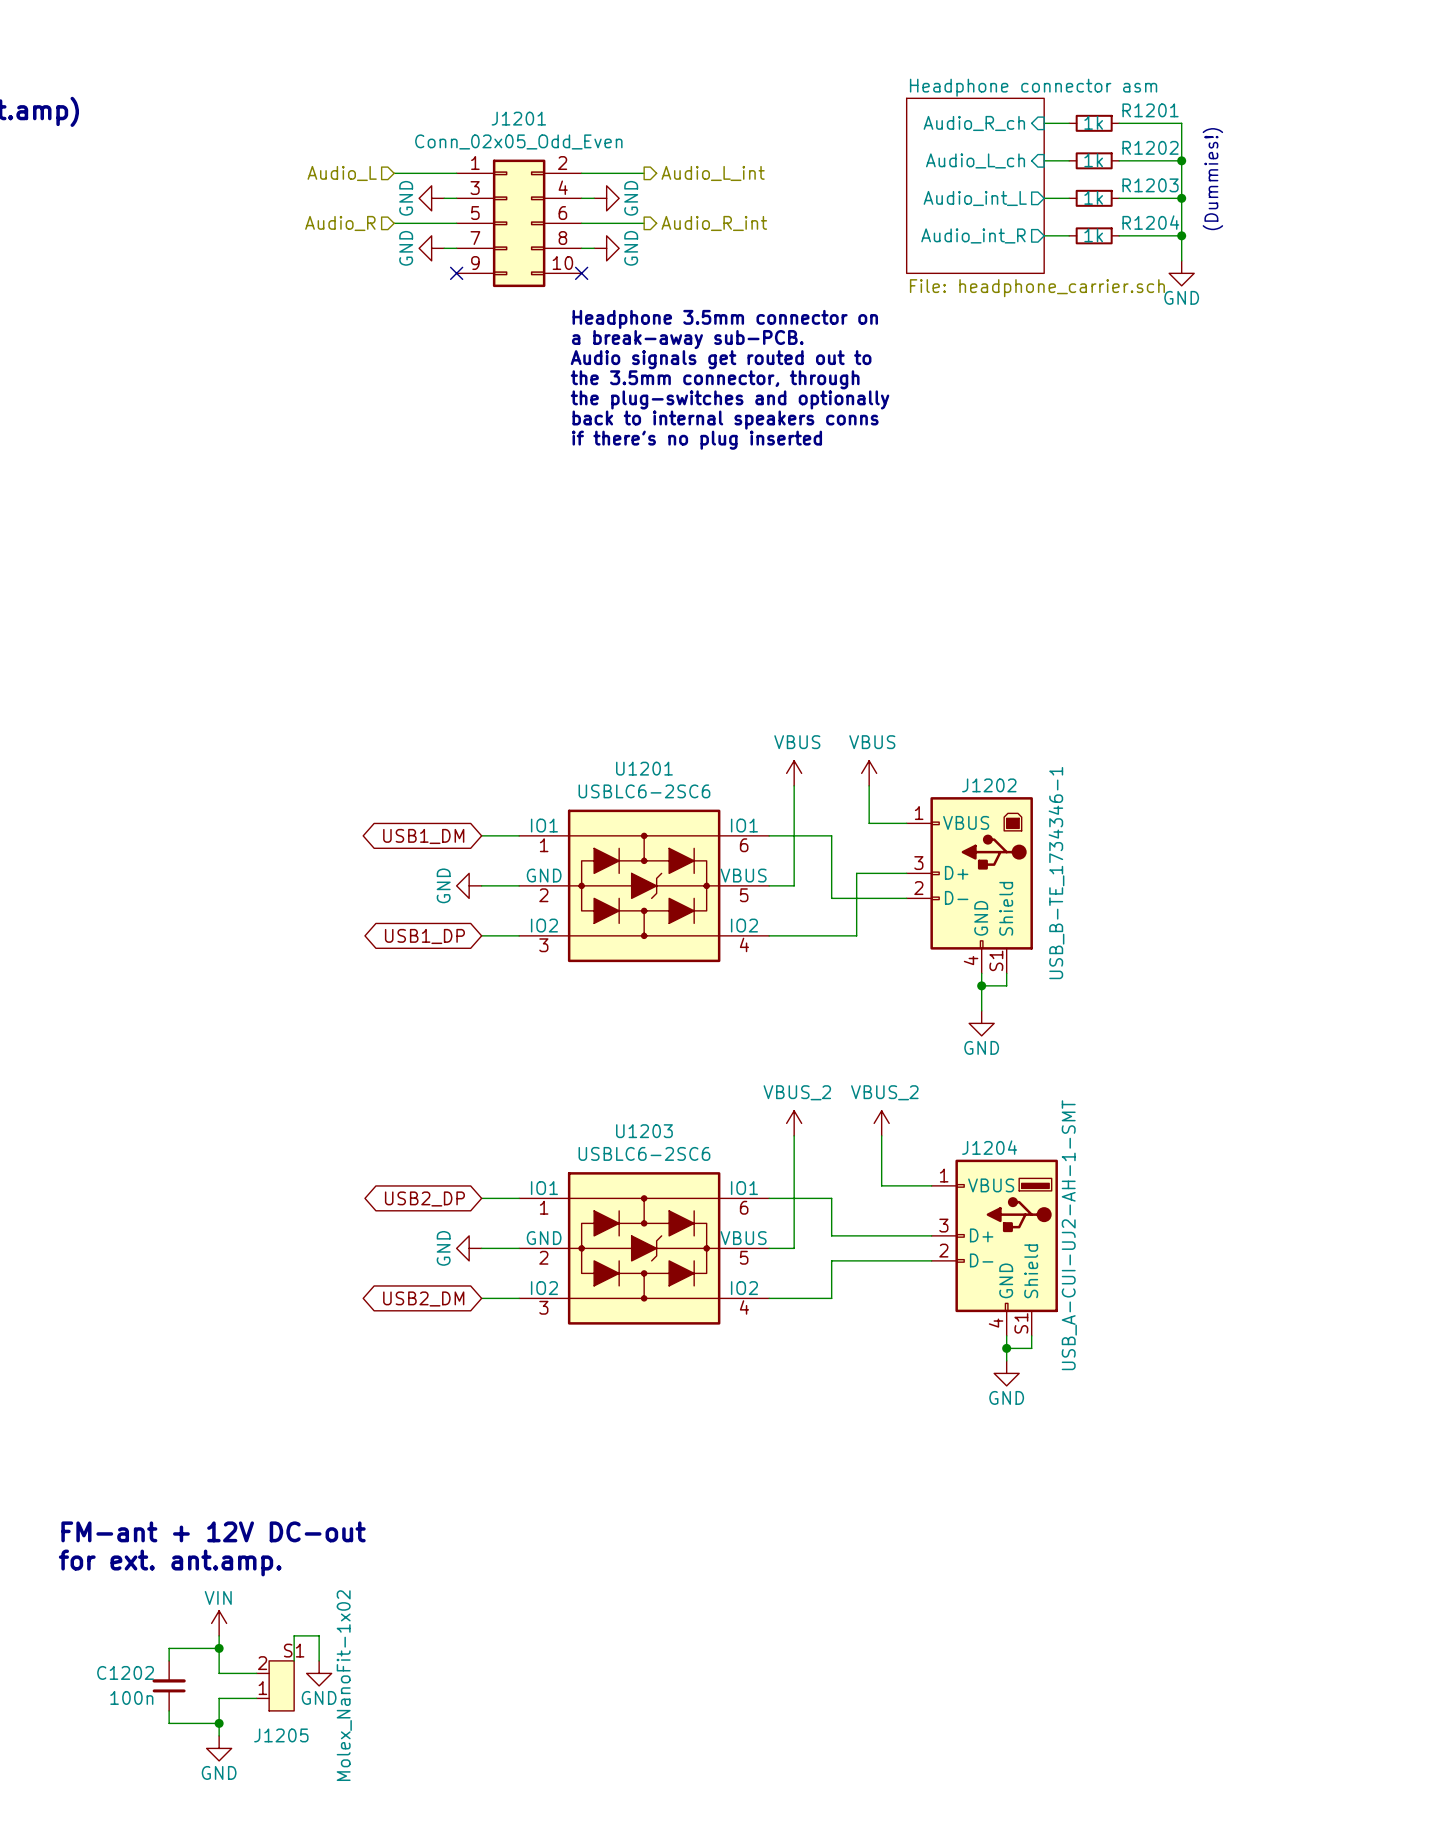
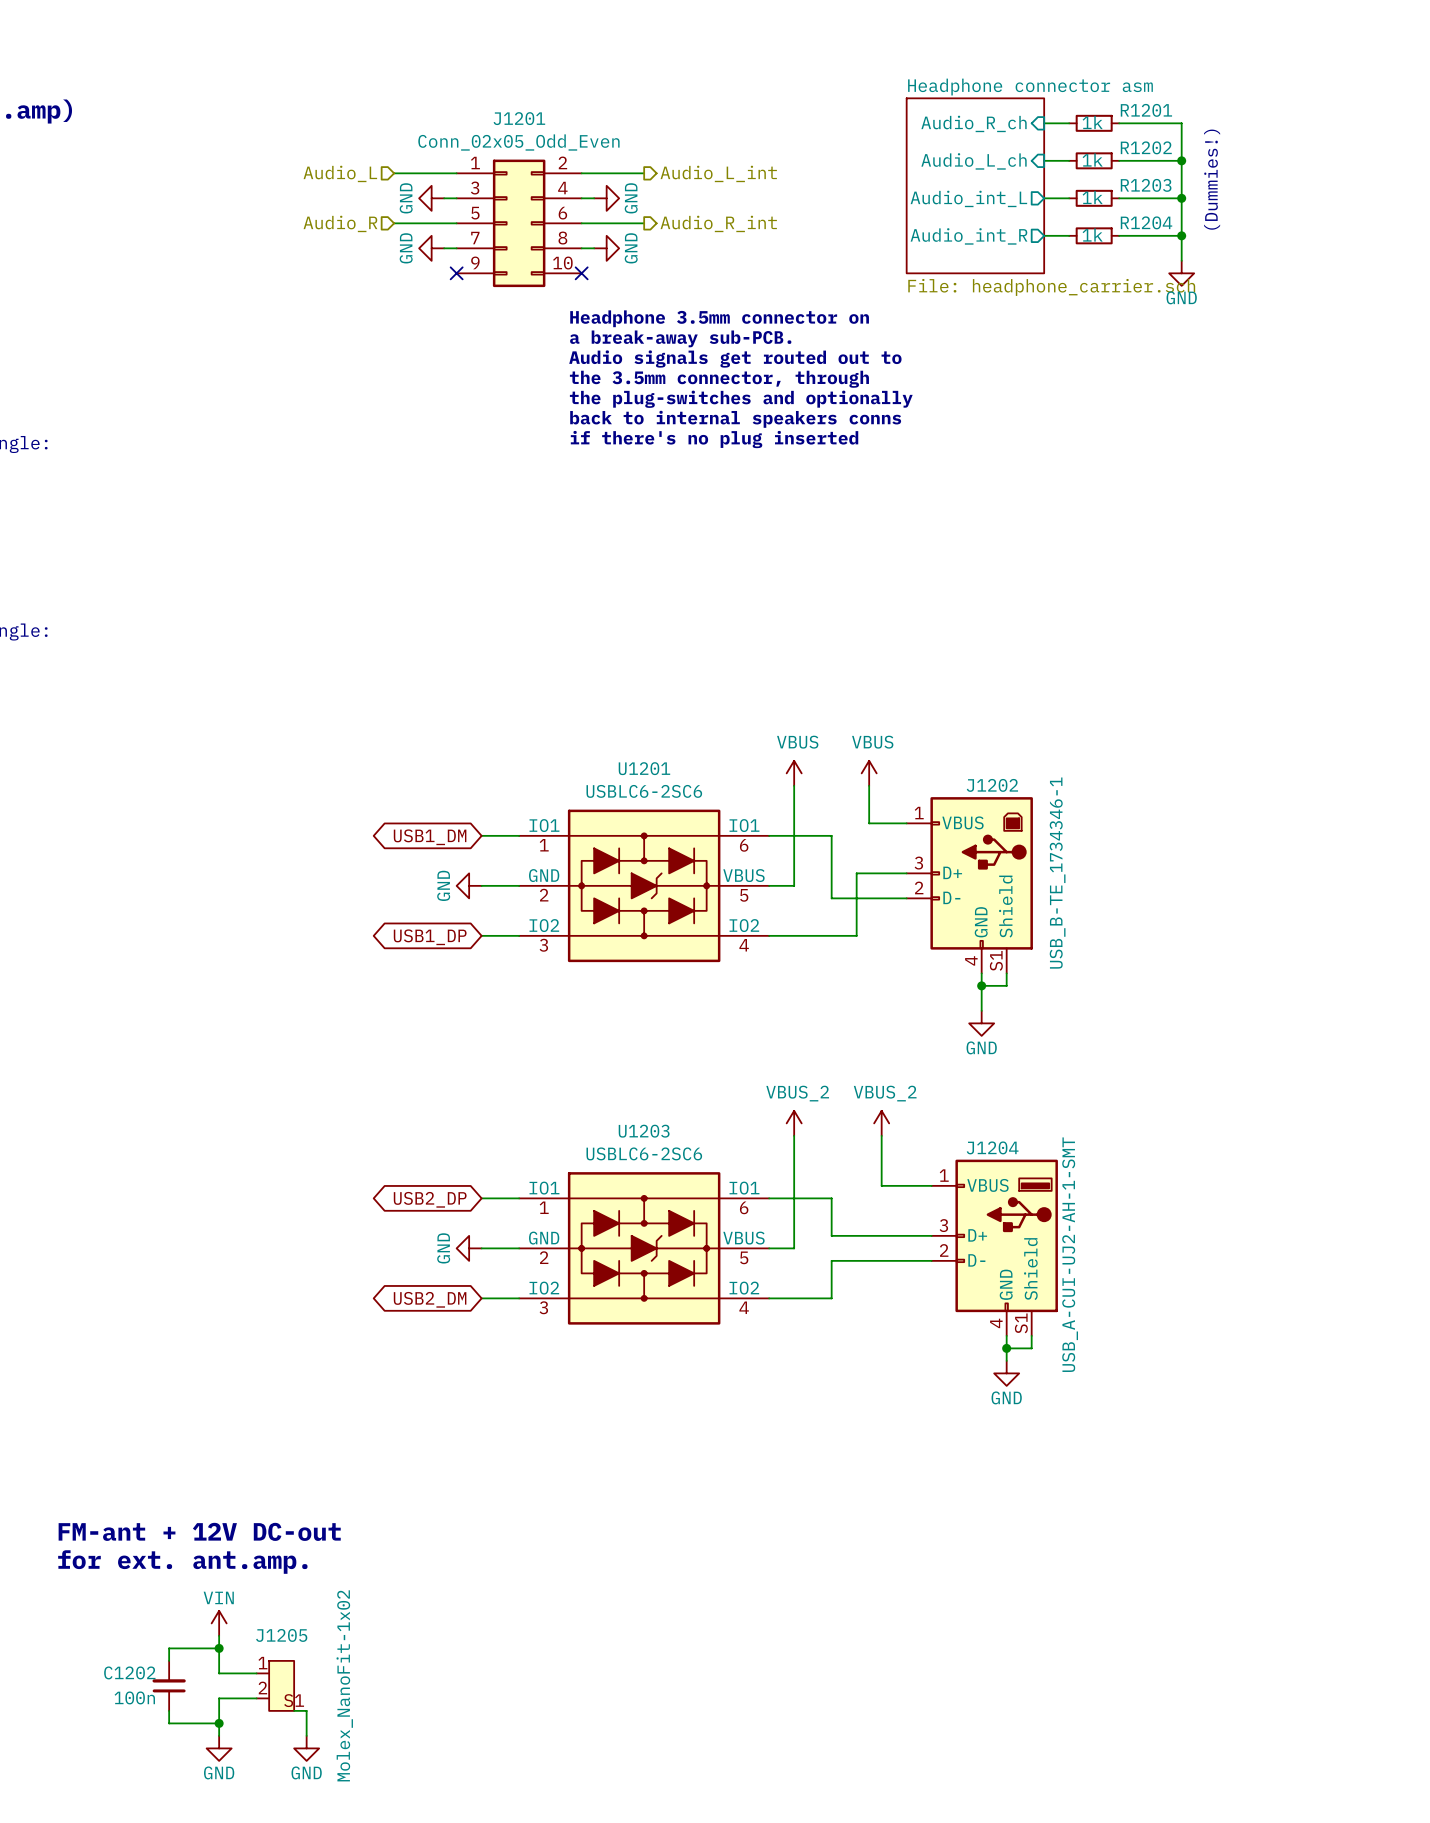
wire: (294, 1660) (294, 1635) (319, 1635) (319, 1660) -> none
power symbol position: GND (319, 1673) -> GND (306, 1748)
J1205 flip: as is (281, 1685) -> up-down (281, 1685)
wire: none -> (294, 1710) (306, 1710) (306, 1735)

